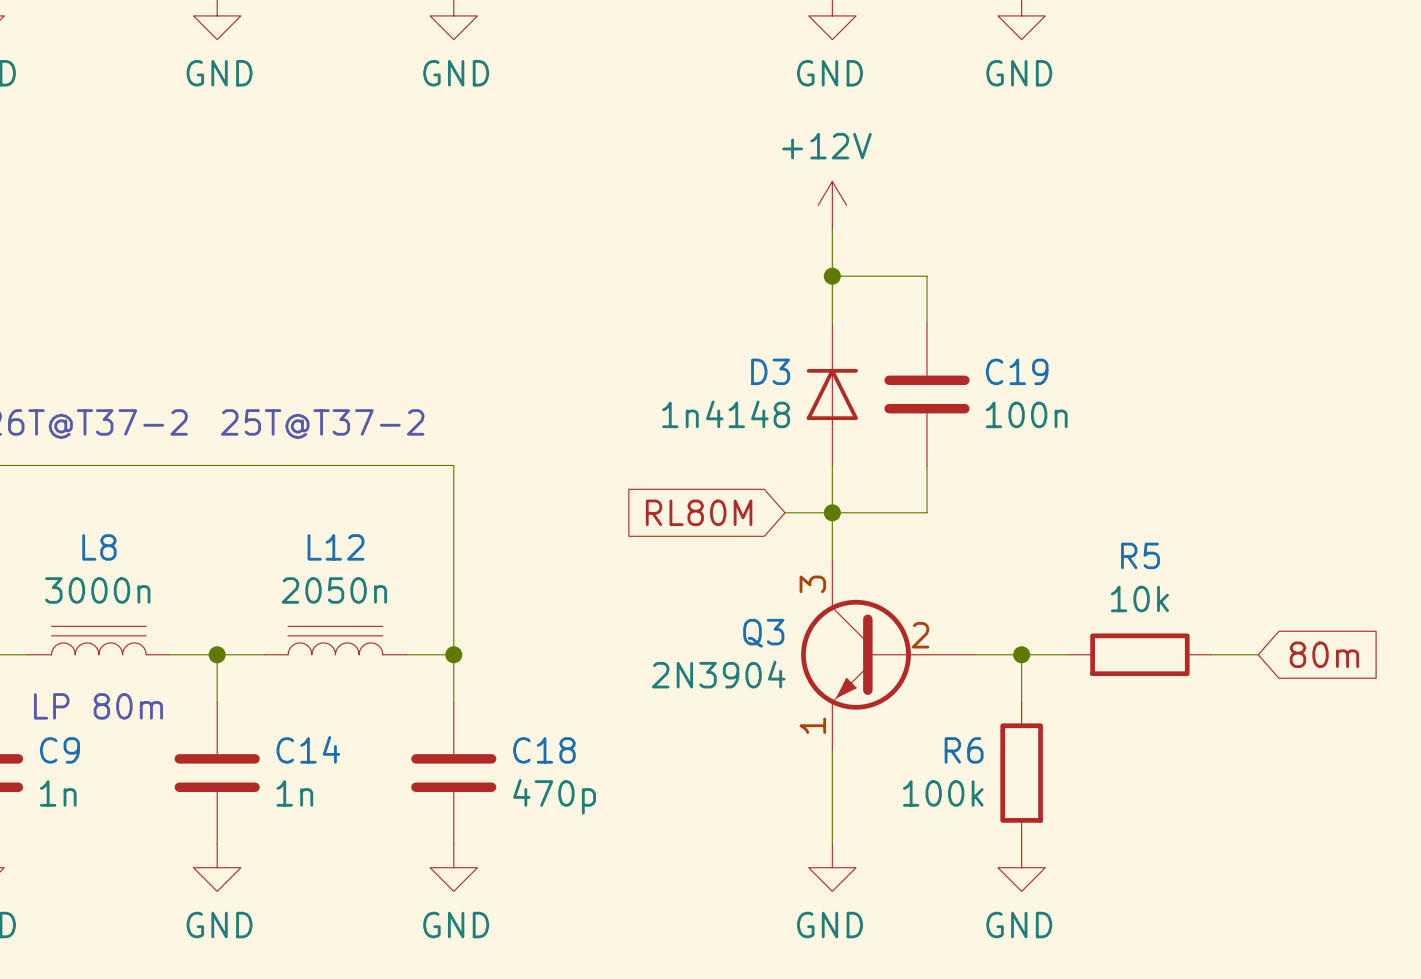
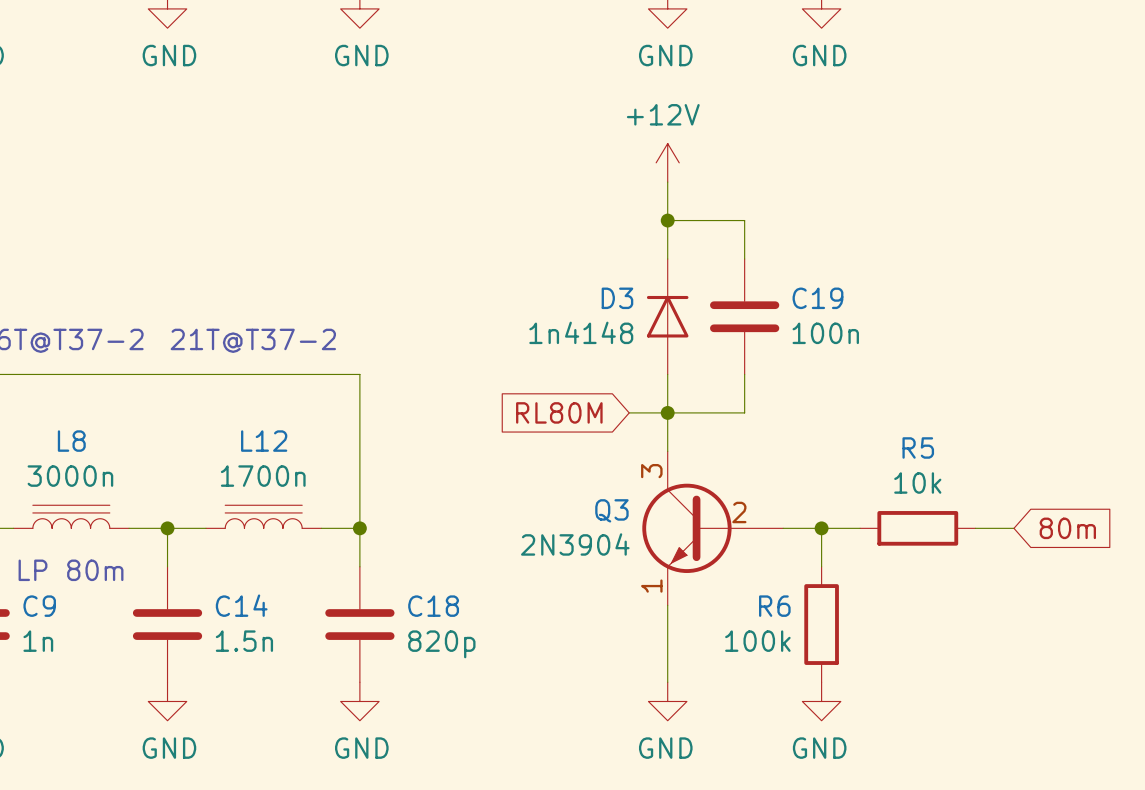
text: 25T@T37-2 (322, 424) -> 21T@T37-2 (253, 340)
L12 value: 2050n (334, 590) -> 1700n (263, 476)
C14 value: 1n (294, 793) -> 1.5n (244, 641)
C18 value: 470p (554, 796) -> 820p (441, 644)

